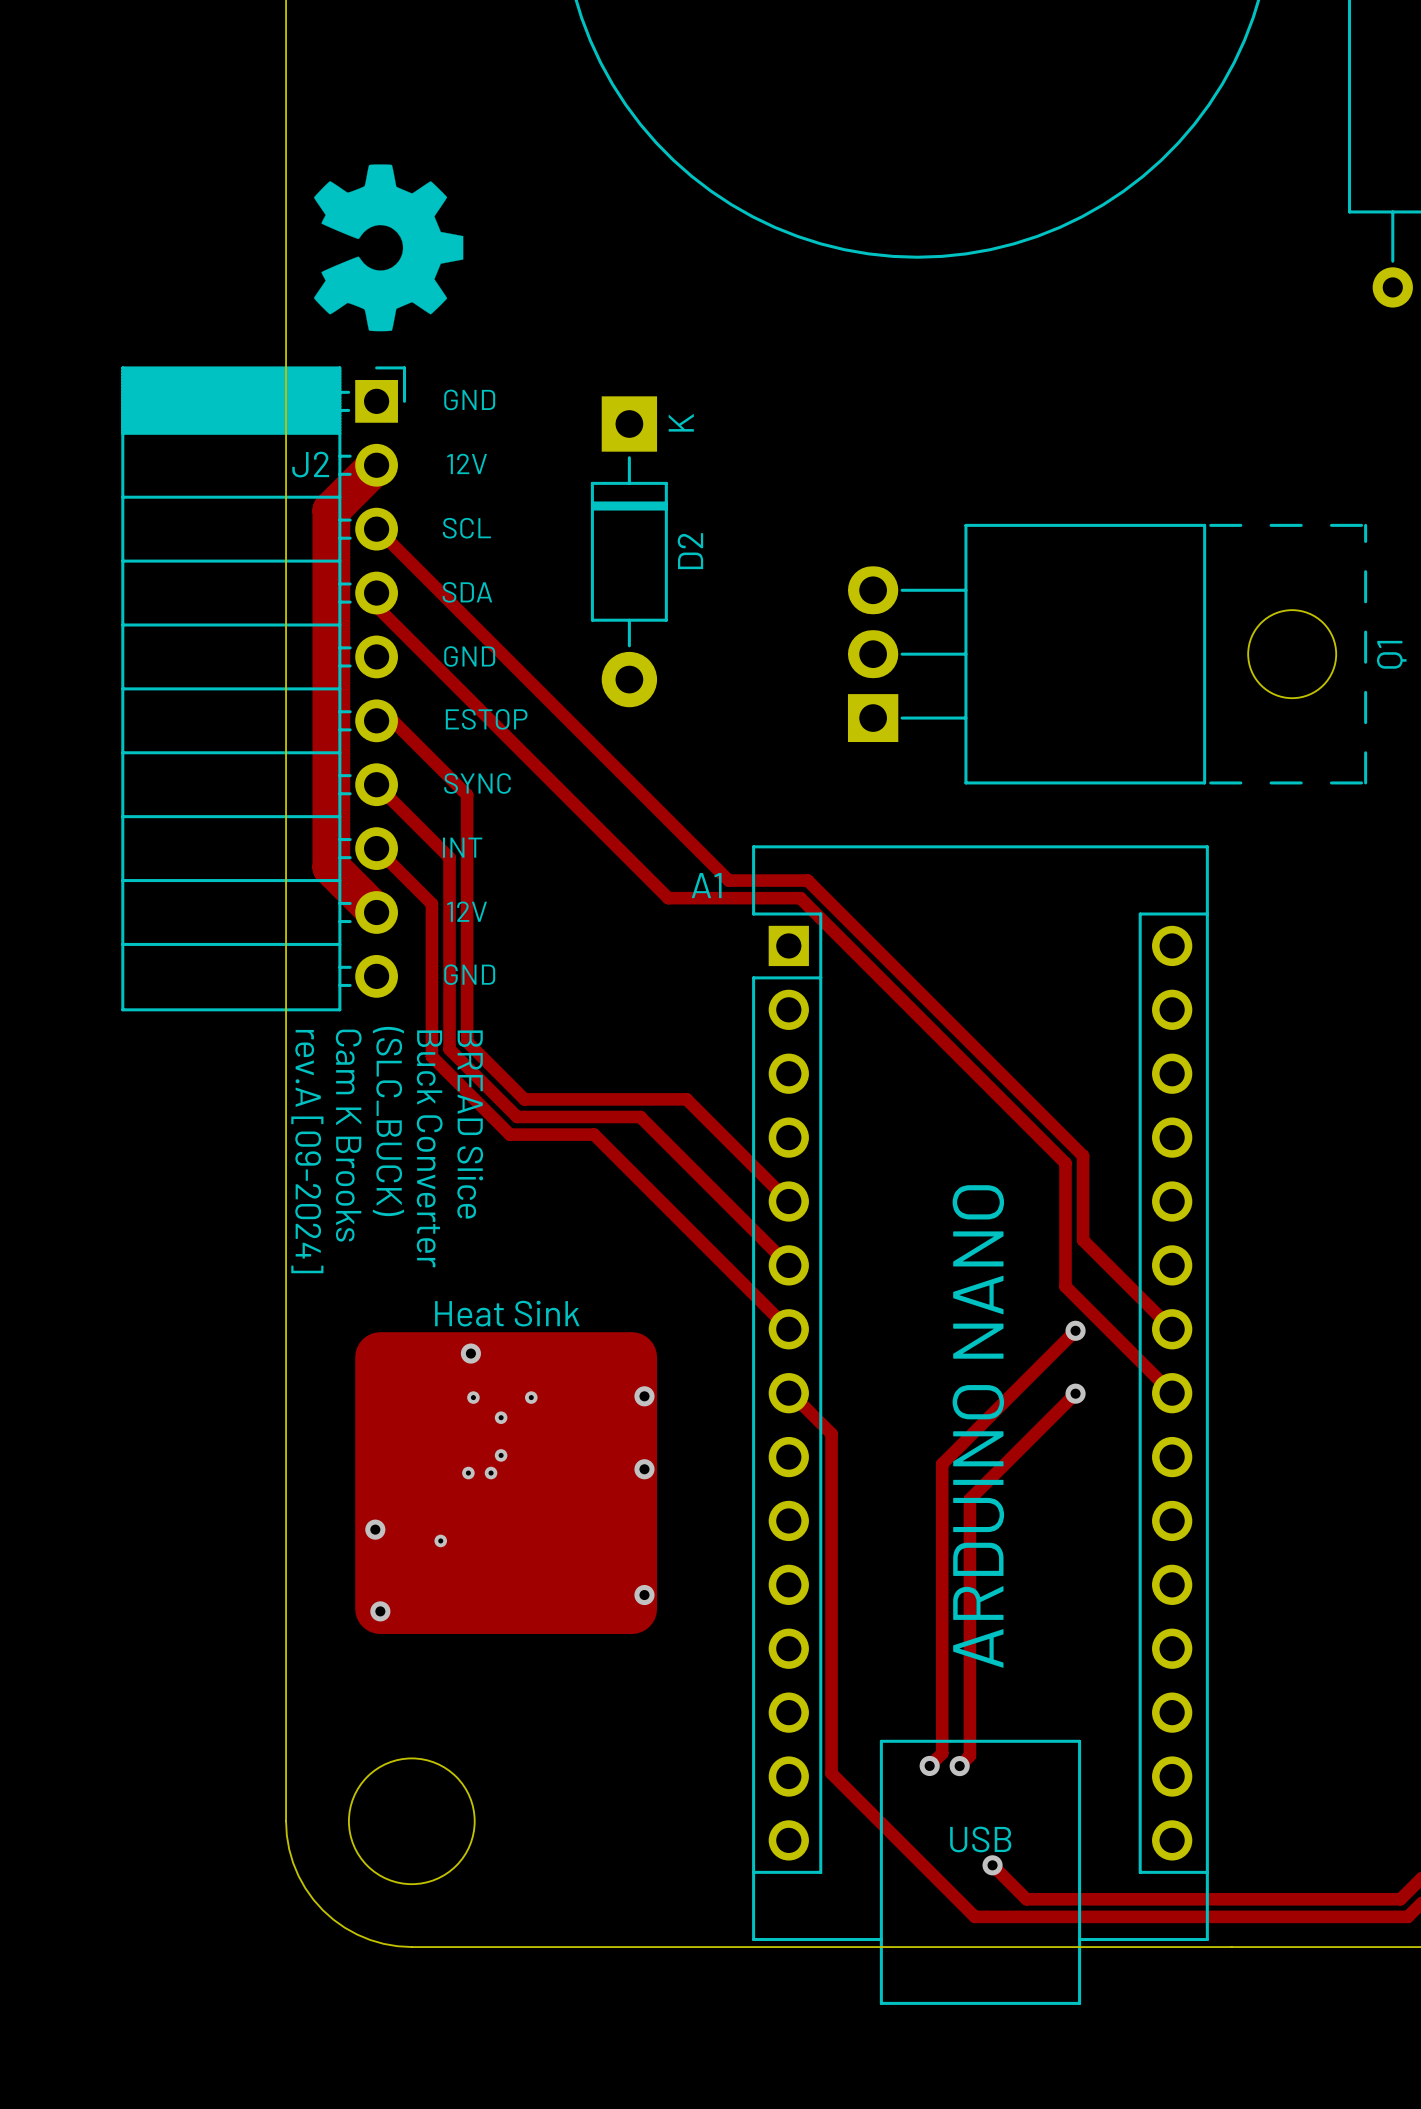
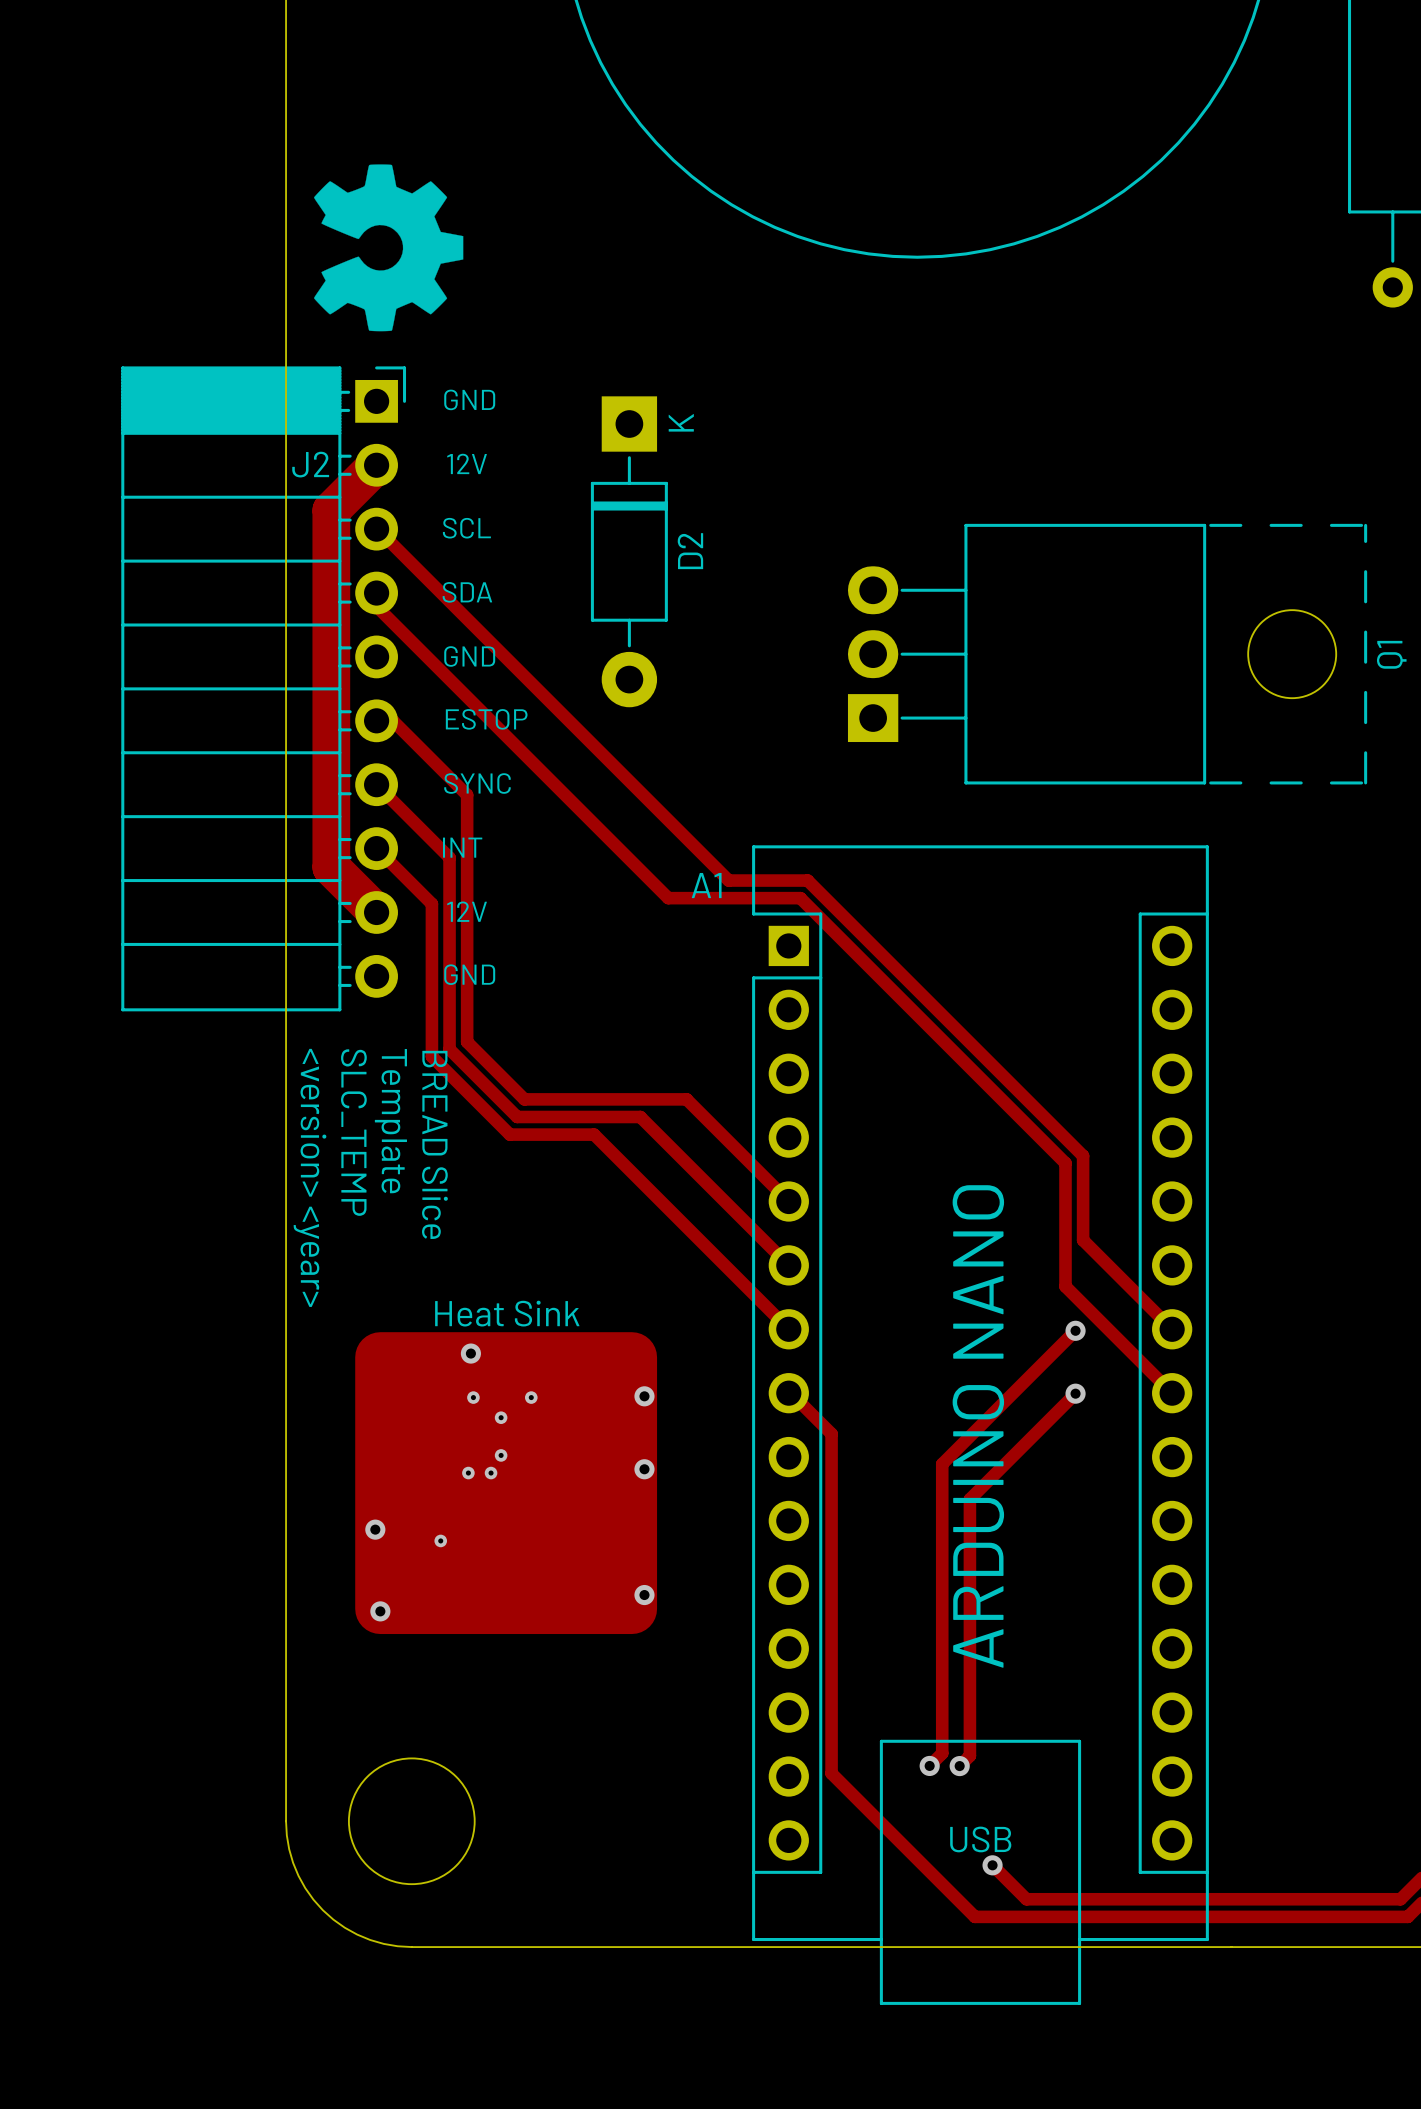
text: (SLC_BUCK) (388, 1121) -> none
text: none -> Template (390, 1121)
text position: BREAD Slice (470, 1124) -> BREAD Slice (434, 1144)
text: none -> SLC_TEMP (353, 1132)
text: Cam K Brooks (348, 1135) -> none
text: Buck Converter (429, 1148) -> none
text: rev.A [09-2024] (307, 1151) -> none
text: none -> <version> <year> (310, 1177)

